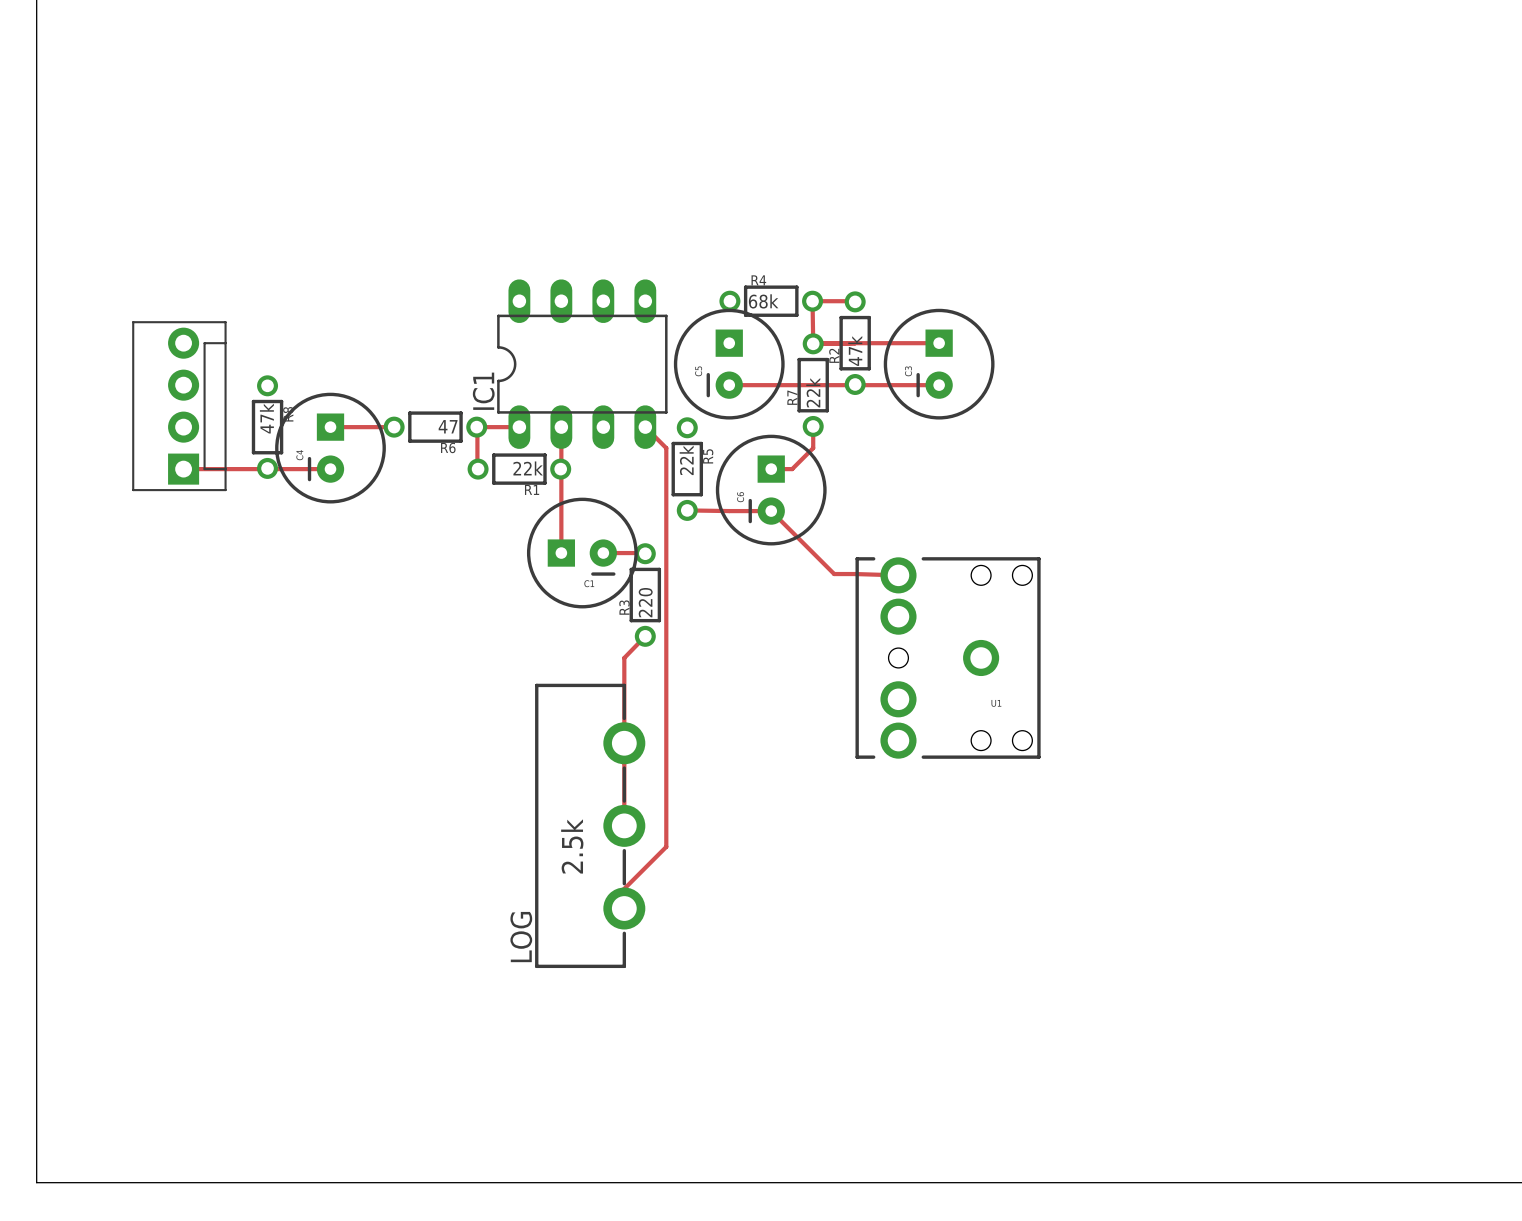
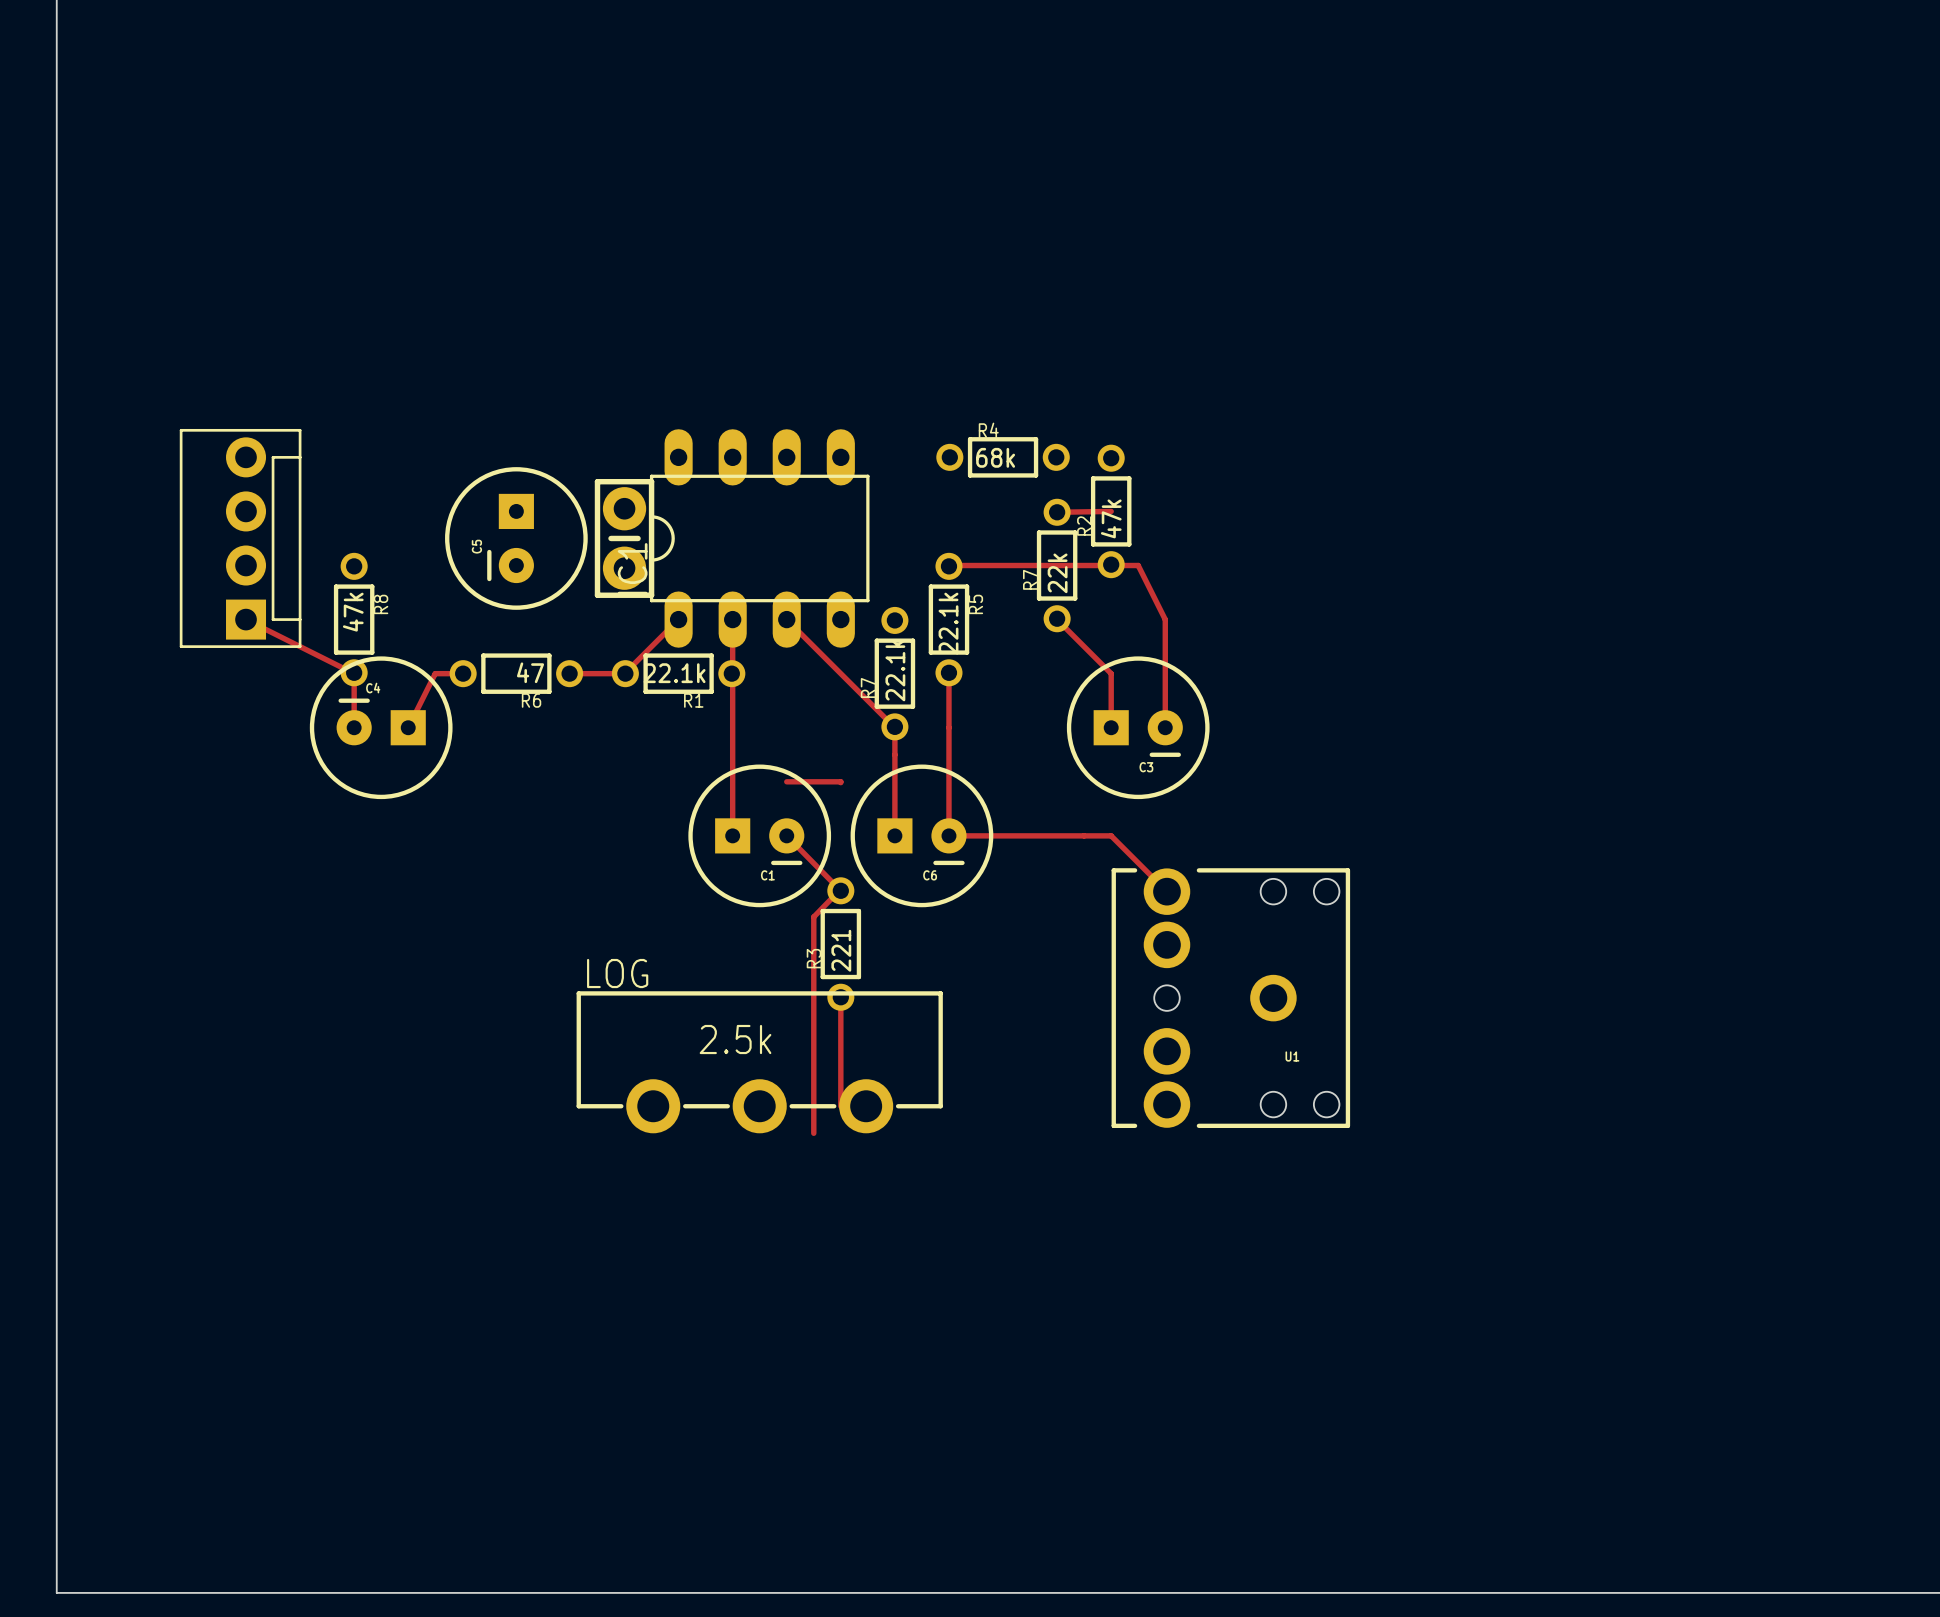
track: (855, 301) (812, 301) (813, 343) (939, 343) -> none
part: none -> (624, 538)
C5 position: (729, 364) -> (516, 538)
C3 rotation: 0° (939, 364) -> 90° counterclockwise (1138, 727)
C3 position: (939, 364) -> (1138, 727)
track: (876, 385) (939, 385) -> (1138, 565) (1165, 619) (1165, 727)
part position: (179, 406) -> (240, 538)
track: (813, 426) (813, 448) (792, 469) (771, 469) -> (1057, 619) (1111, 673) (1111, 727)
track: none -> (246, 619) (354, 673) (354, 727)
track: (330, 427) (394, 427) -> none
R6 position: (435, 427) -> (516, 673)
track: (476, 427) (519, 427) -> (569, 673) (624, 673) (678, 619)
track: (477, 427) (477, 469) -> (732, 781) (732, 835)
track: none -> (786, 619) (894, 727)
track: (645, 427) (666, 448) (666, 846) (624, 888) (624, 908) -> none
R5: none -> 22.1k (948, 619)
C4 rotation: 0° (330, 448) -> 90° clockwise (381, 727)
C4 position: (330, 448) -> (381, 727)
R5 name: R5 (708, 456) -> R7 (868, 687)
R5 value: 22k (686, 460) -> 22.1k (895, 670)
R1 value: 22k (528, 468) -> 22.1k (674, 673)
track: none -> (948, 672) (948, 835) (1111, 835) (1166, 891)
track: (183, 469) (330, 469) -> none
track: none -> (463, 673) (435, 673) (408, 727)
C6 rotation: 0° (771, 490) -> 90° counterclockwise (921, 835)
C6 position: (771, 490) -> (921, 835)
track: (687, 510) (771, 511) (834, 574) (898, 575) -> (894, 726) (894, 835)
C1 position: (582, 553) -> (759, 835)
track: none -> (786, 835) (840, 890)
R3 position: (645, 595) -> (840, 944)
R3 value: 220 (645, 602) -> 221 (841, 950)
U1 position: (948, 657) -> (1230, 998)
track: none -> (840, 997) (840, 1106)
LOG rotation: 0° (590, 825) -> 90° clockwise (759, 1062)

